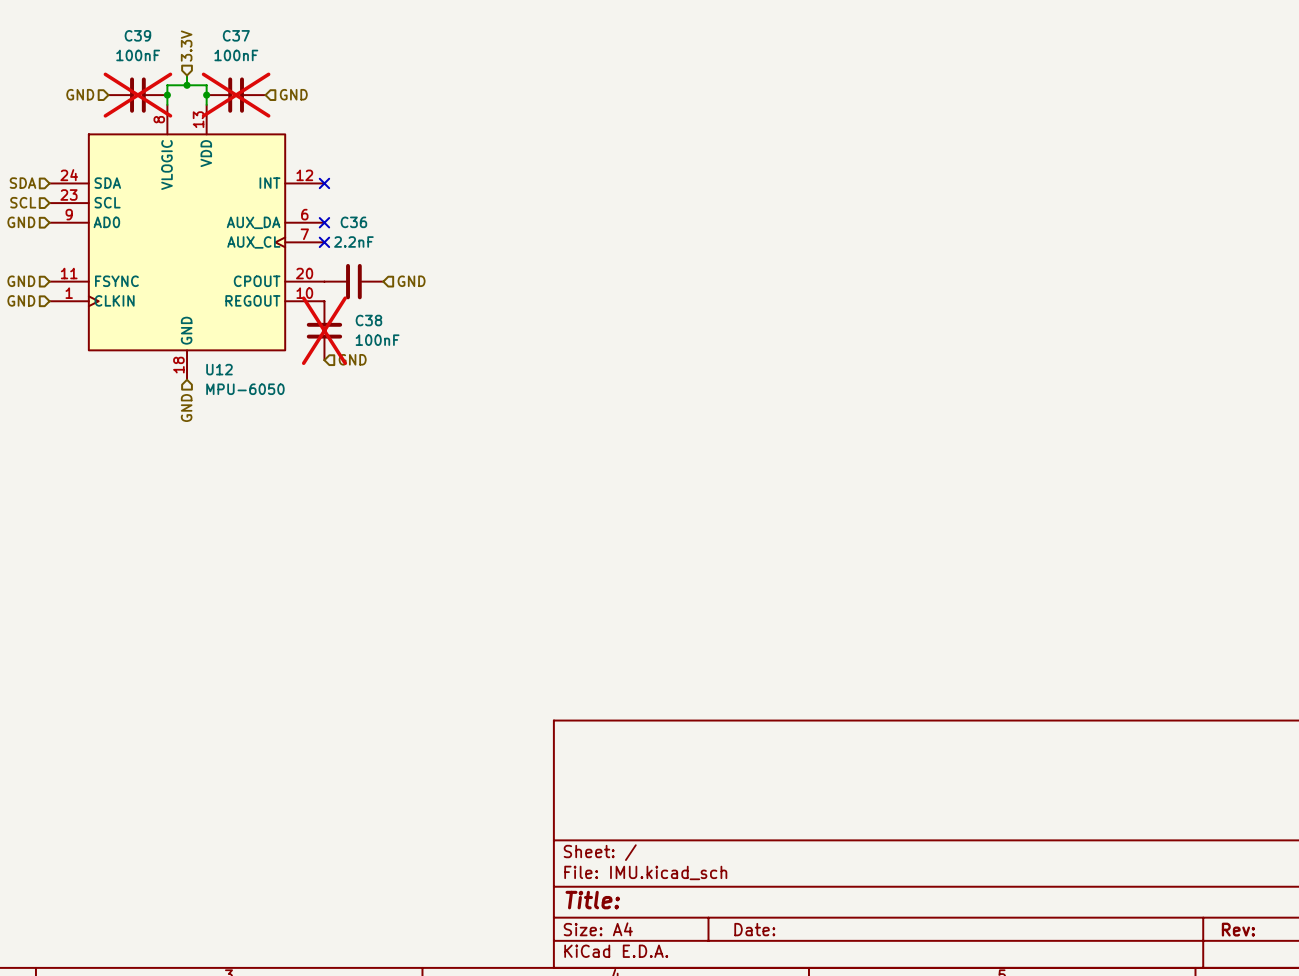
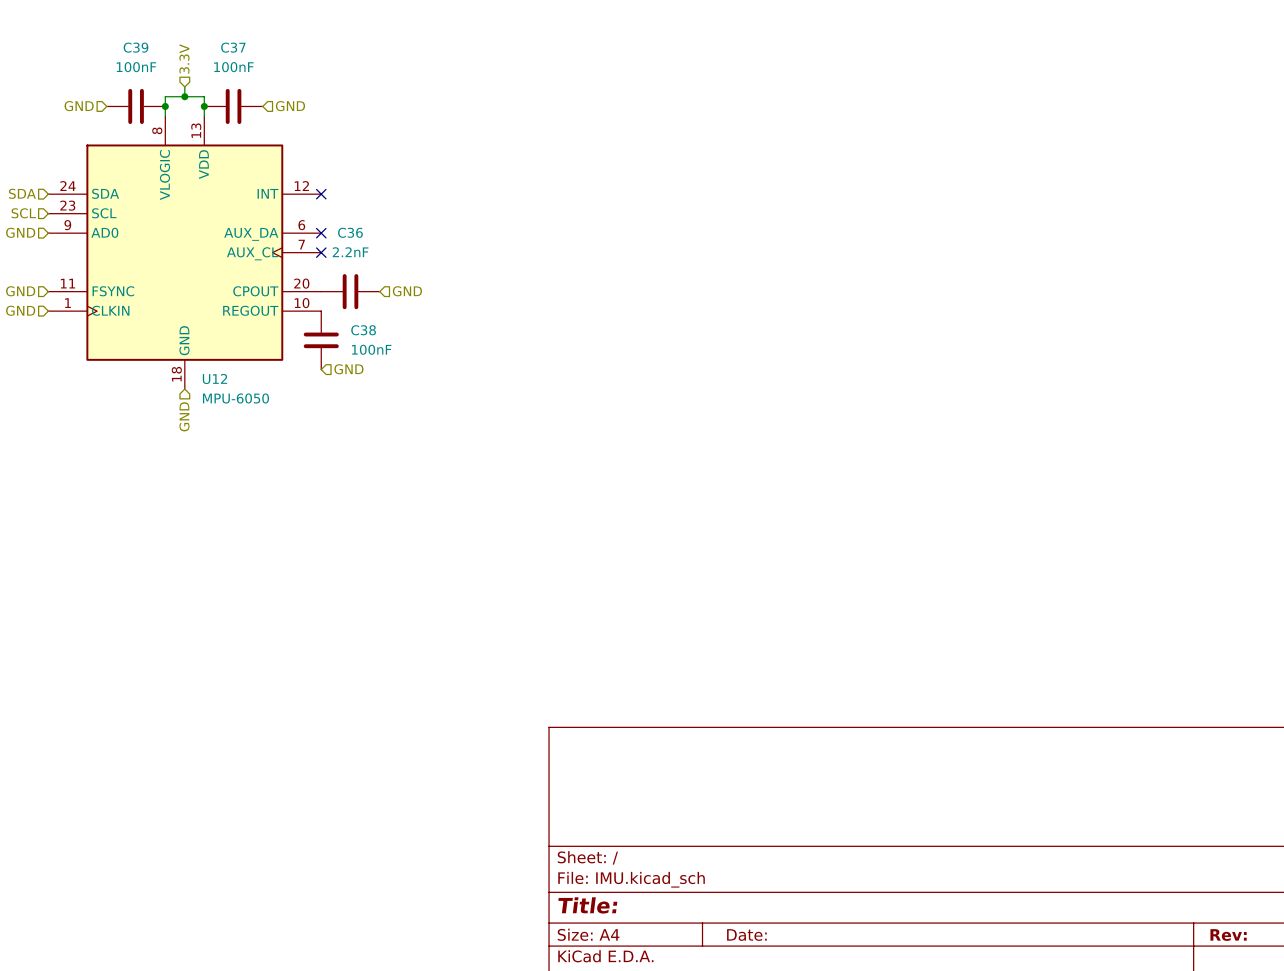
C39 do-not-place cross: (137, 95) -> none
C37 do-not-place cross: (236, 95) -> none
C38 do-not-place cross: (324, 330) -> none

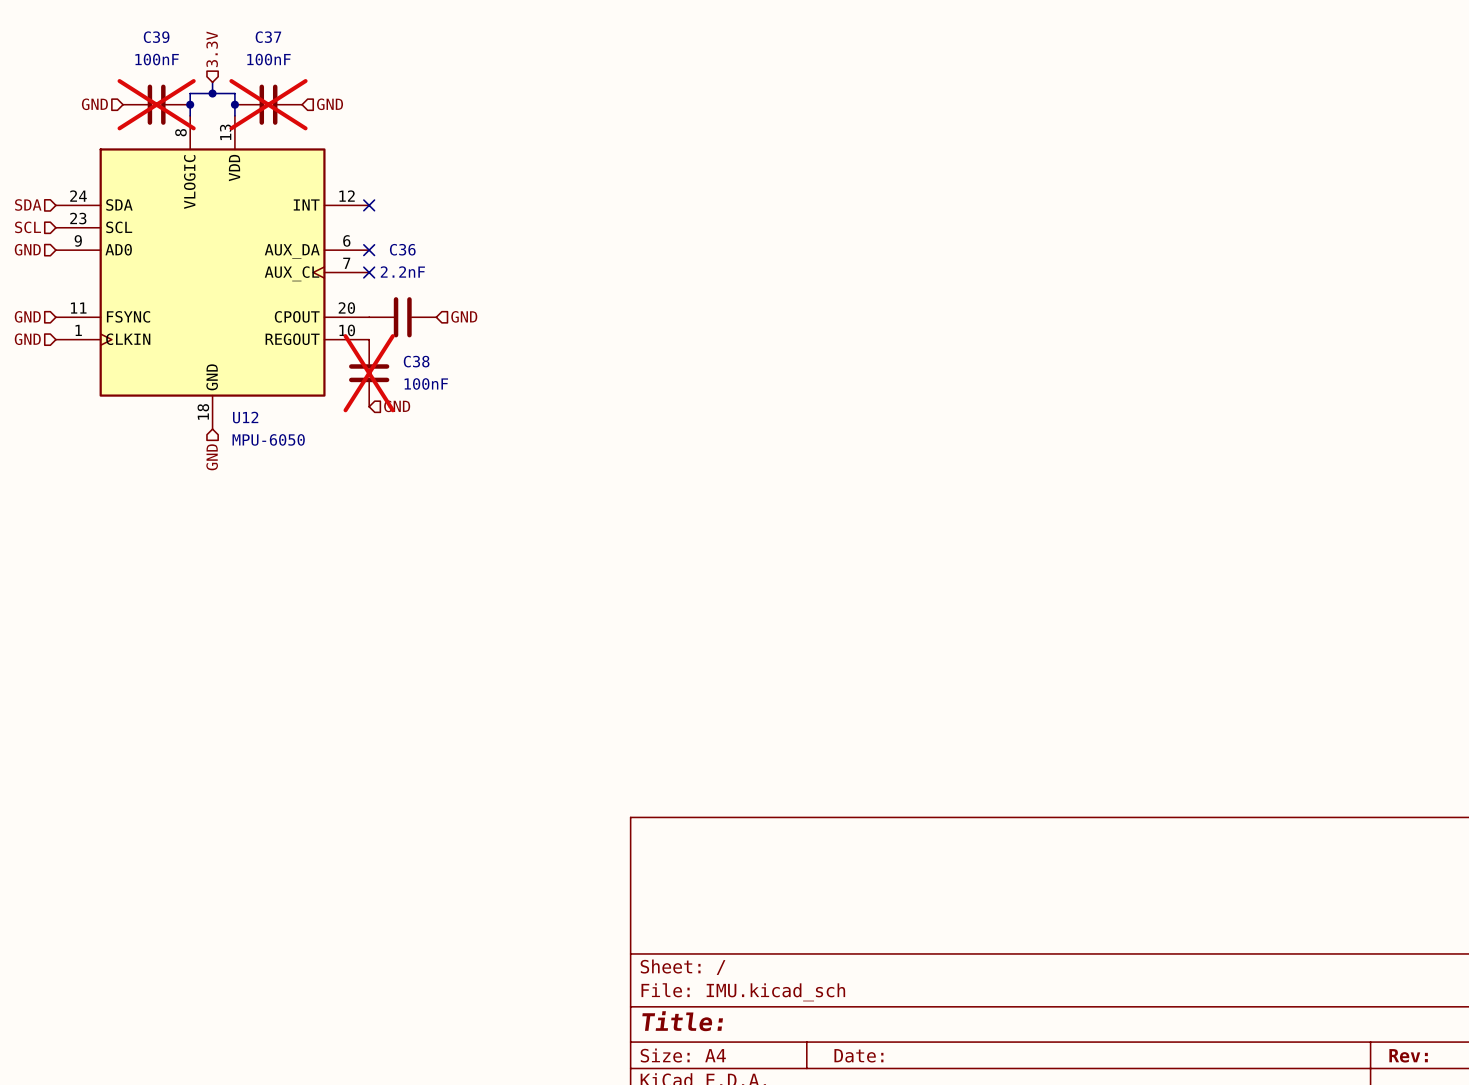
C39 do-not-place cross: none -> (156, 104)
C37 do-not-place cross: none -> (268, 104)
C38 do-not-place cross: none -> (369, 373)

